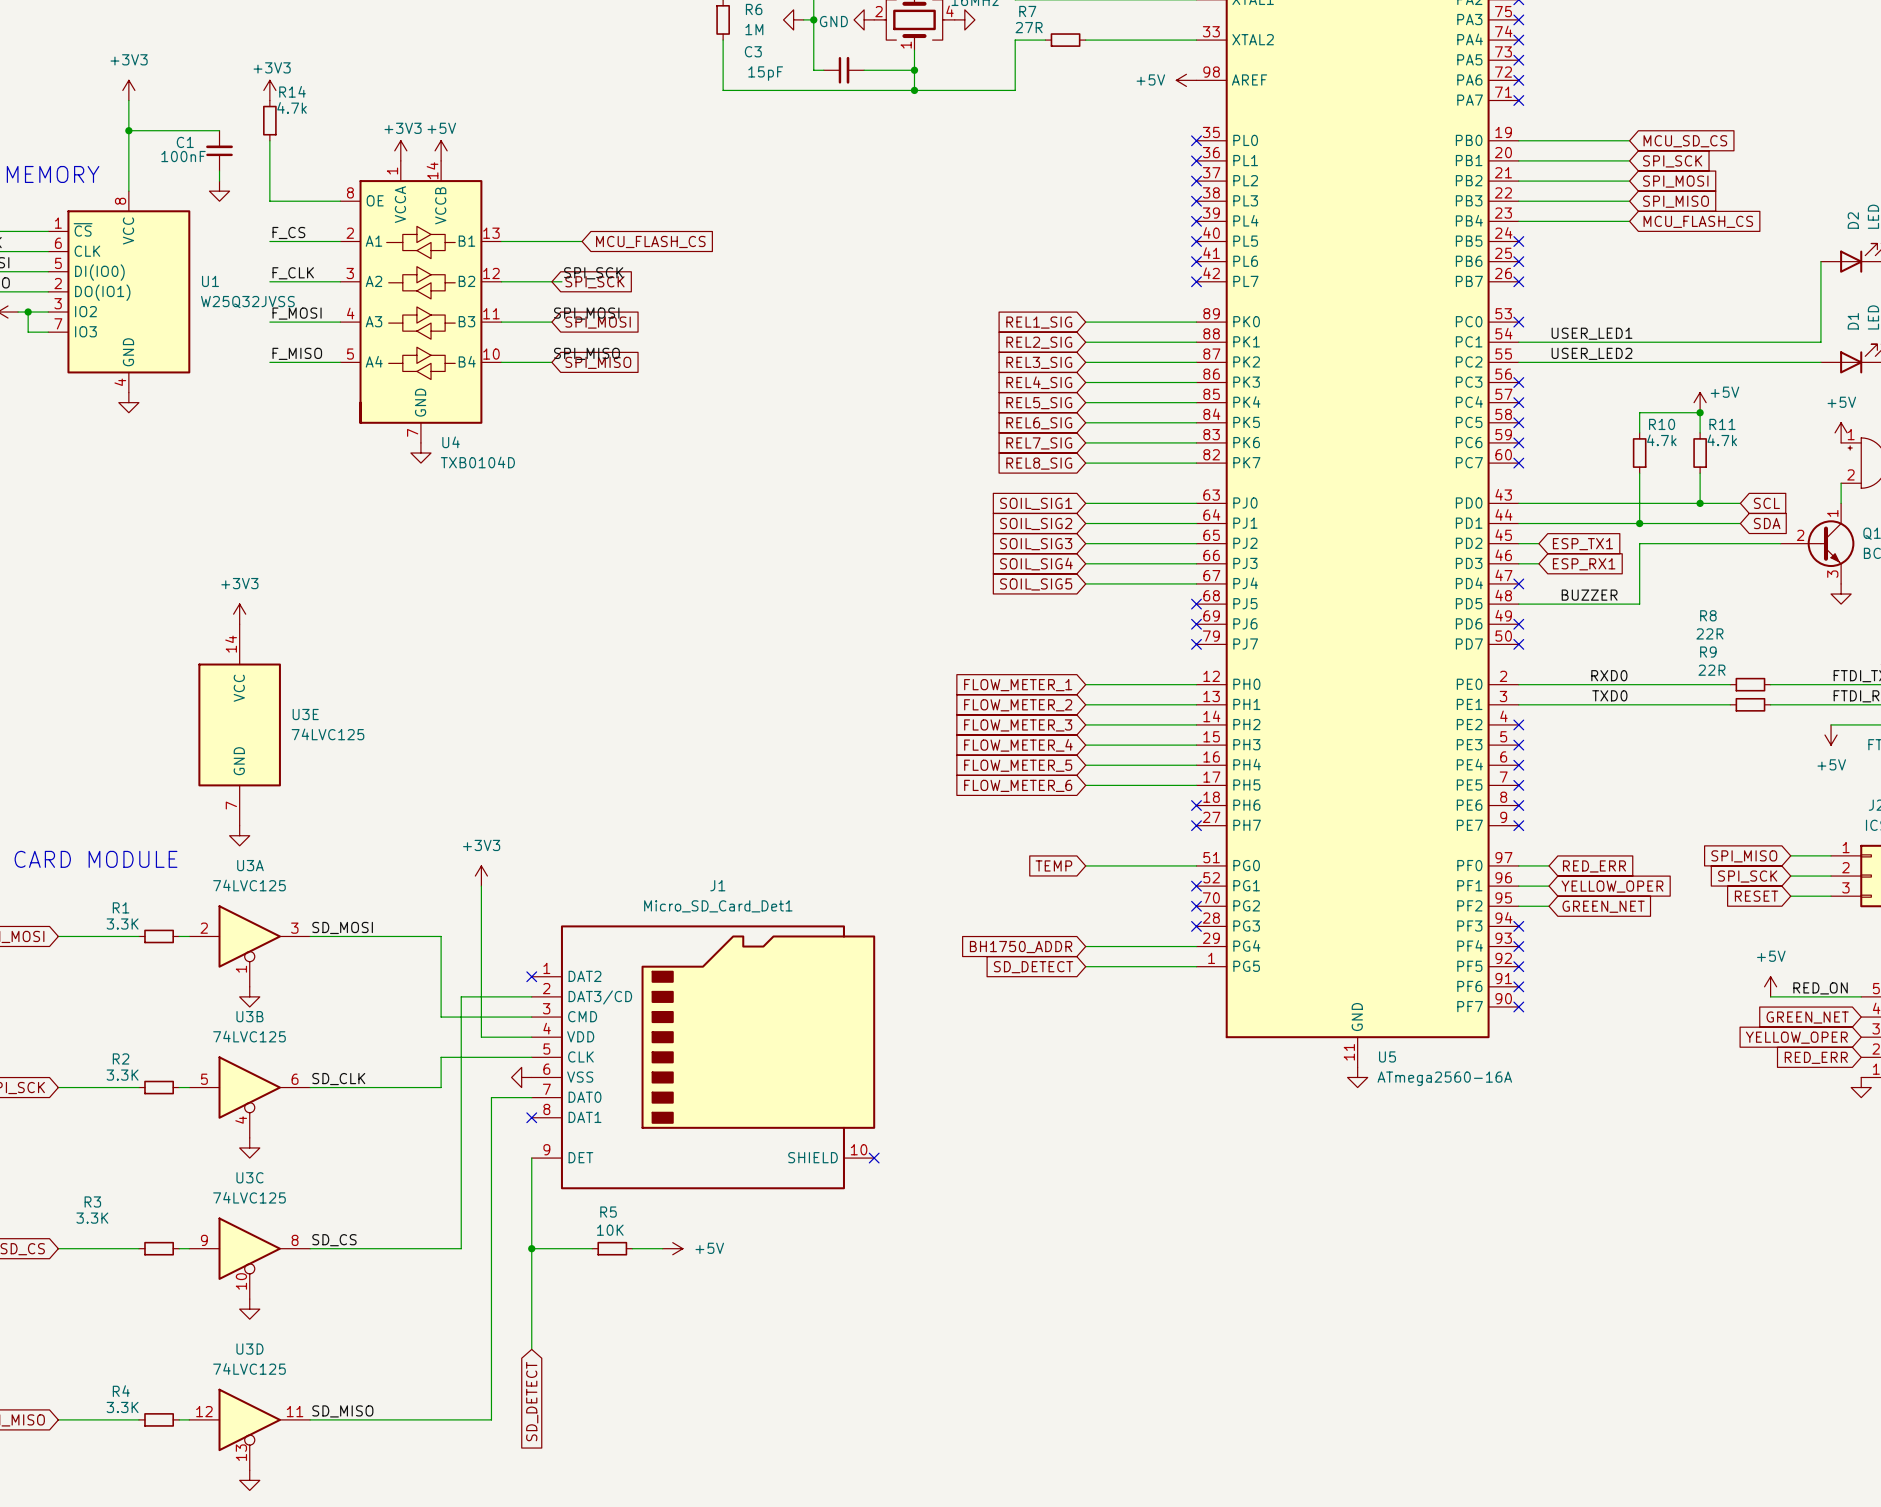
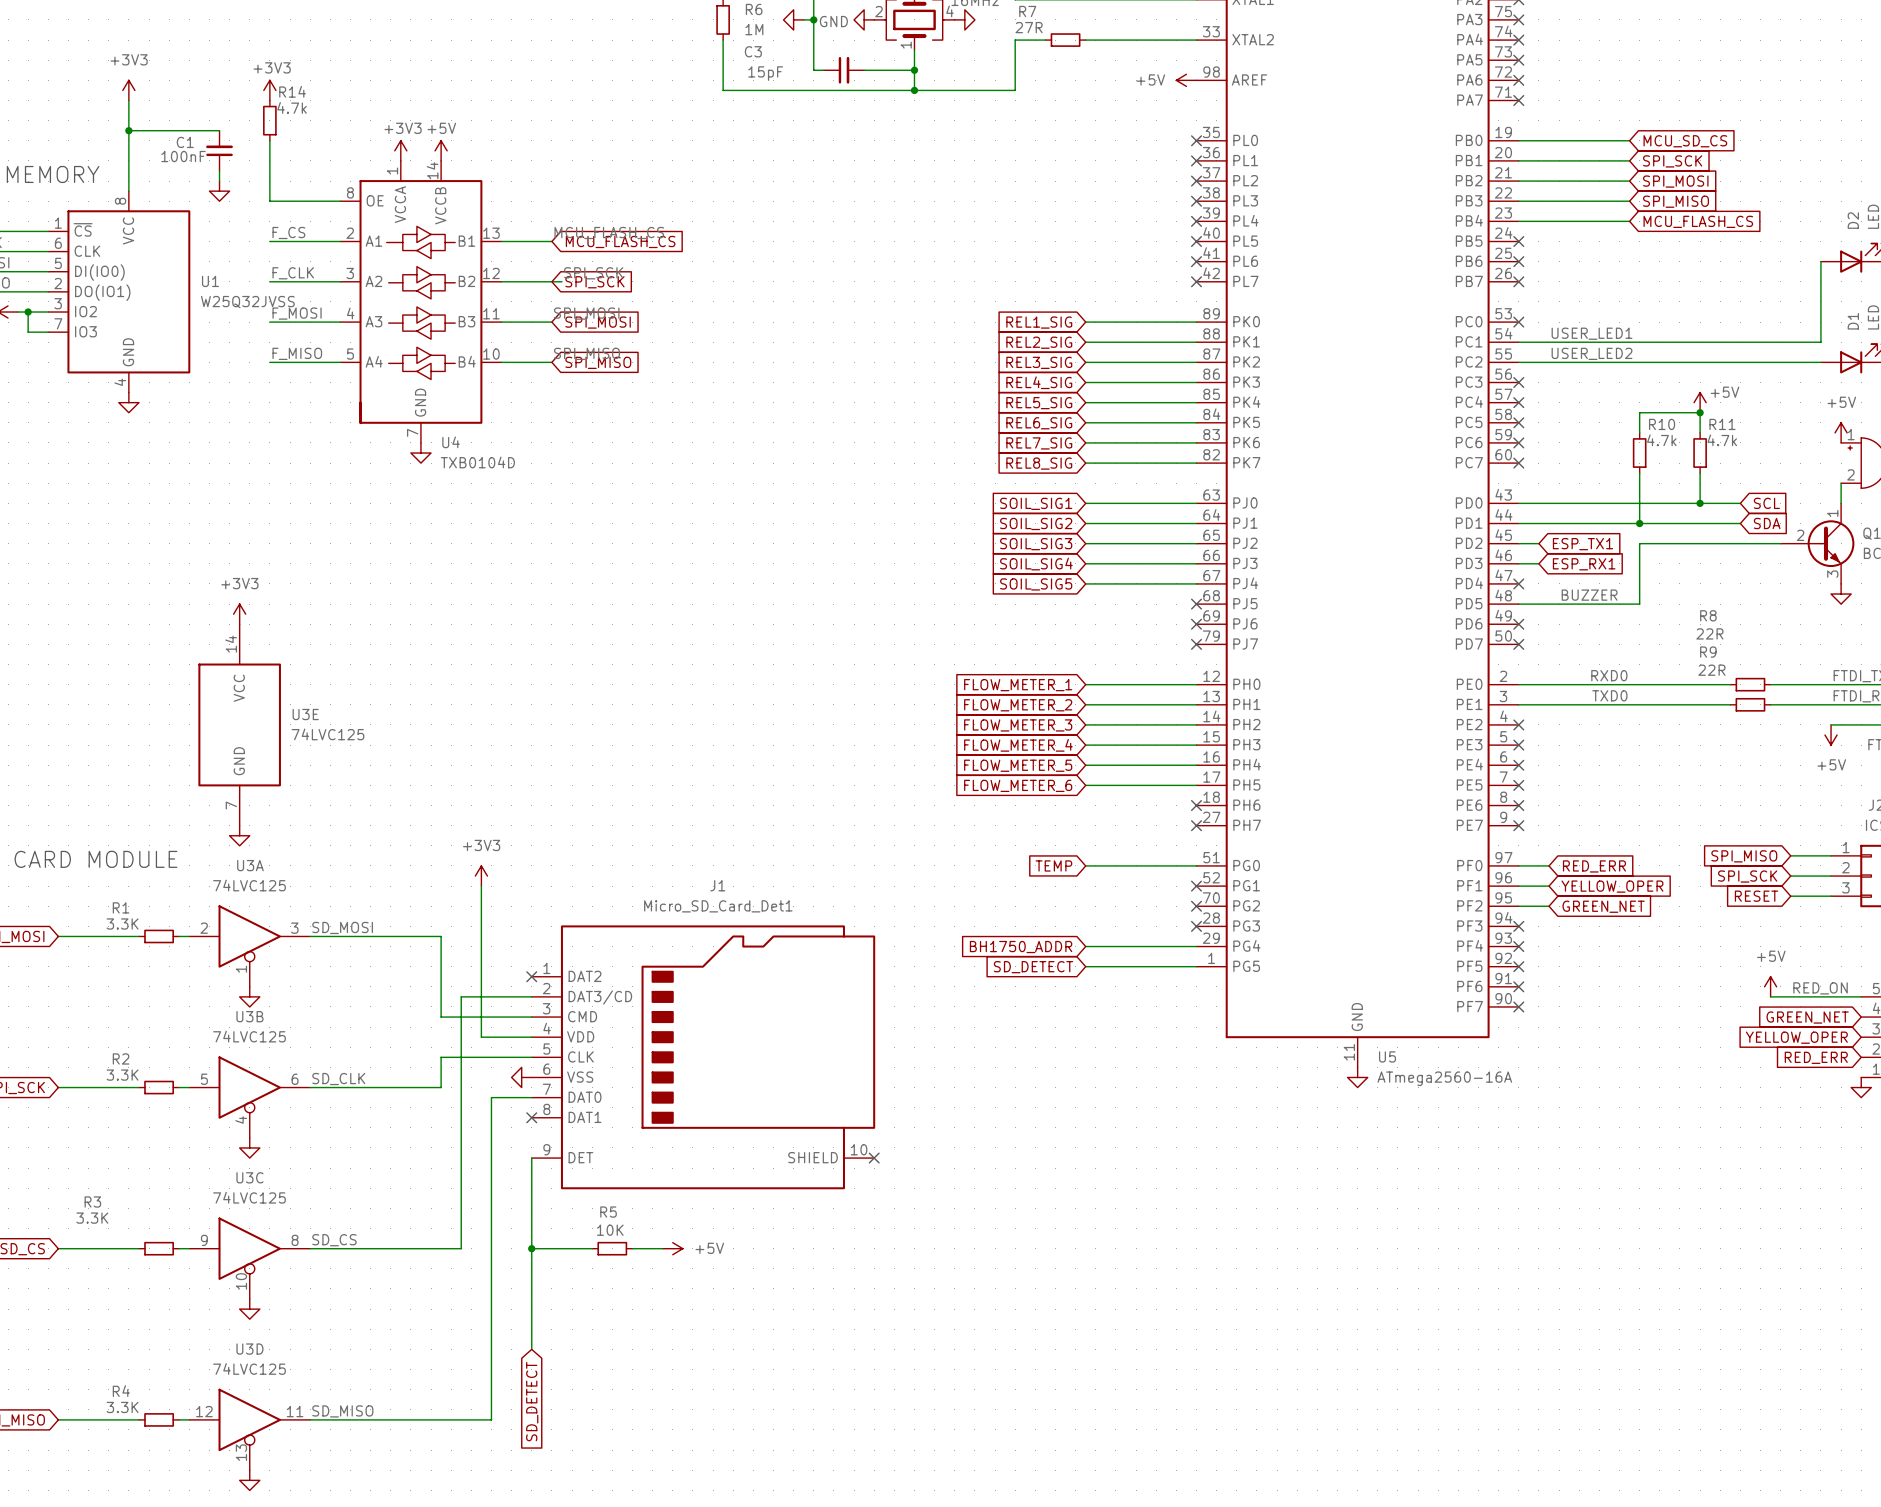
label: none -> MCU_FLASH_CS (609, 232)
wire: (551, 241) (582, 241) -> none
global label position: MCU_FLASH_CS (650, 241) -> MCU_FLASH_CS (620, 241)

